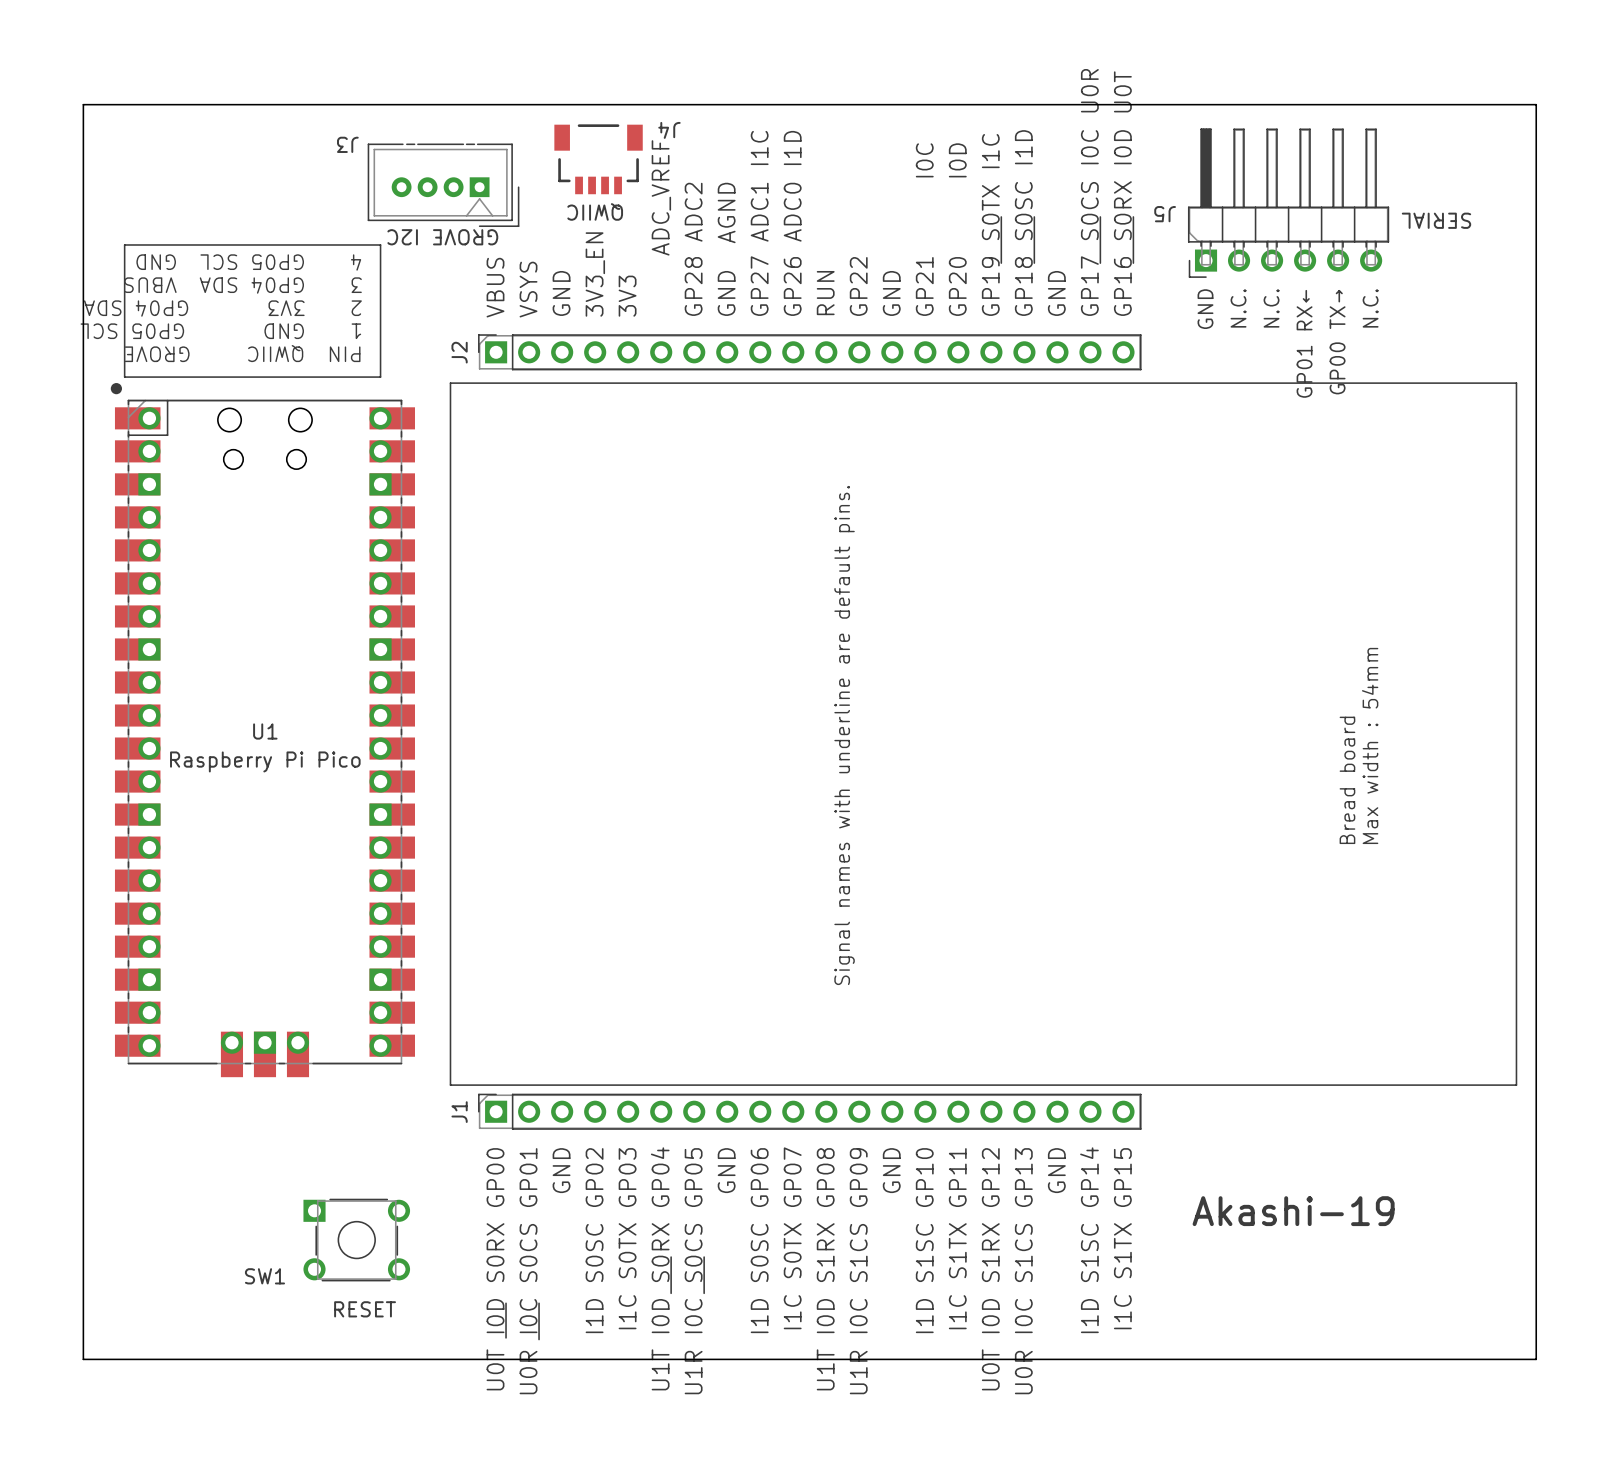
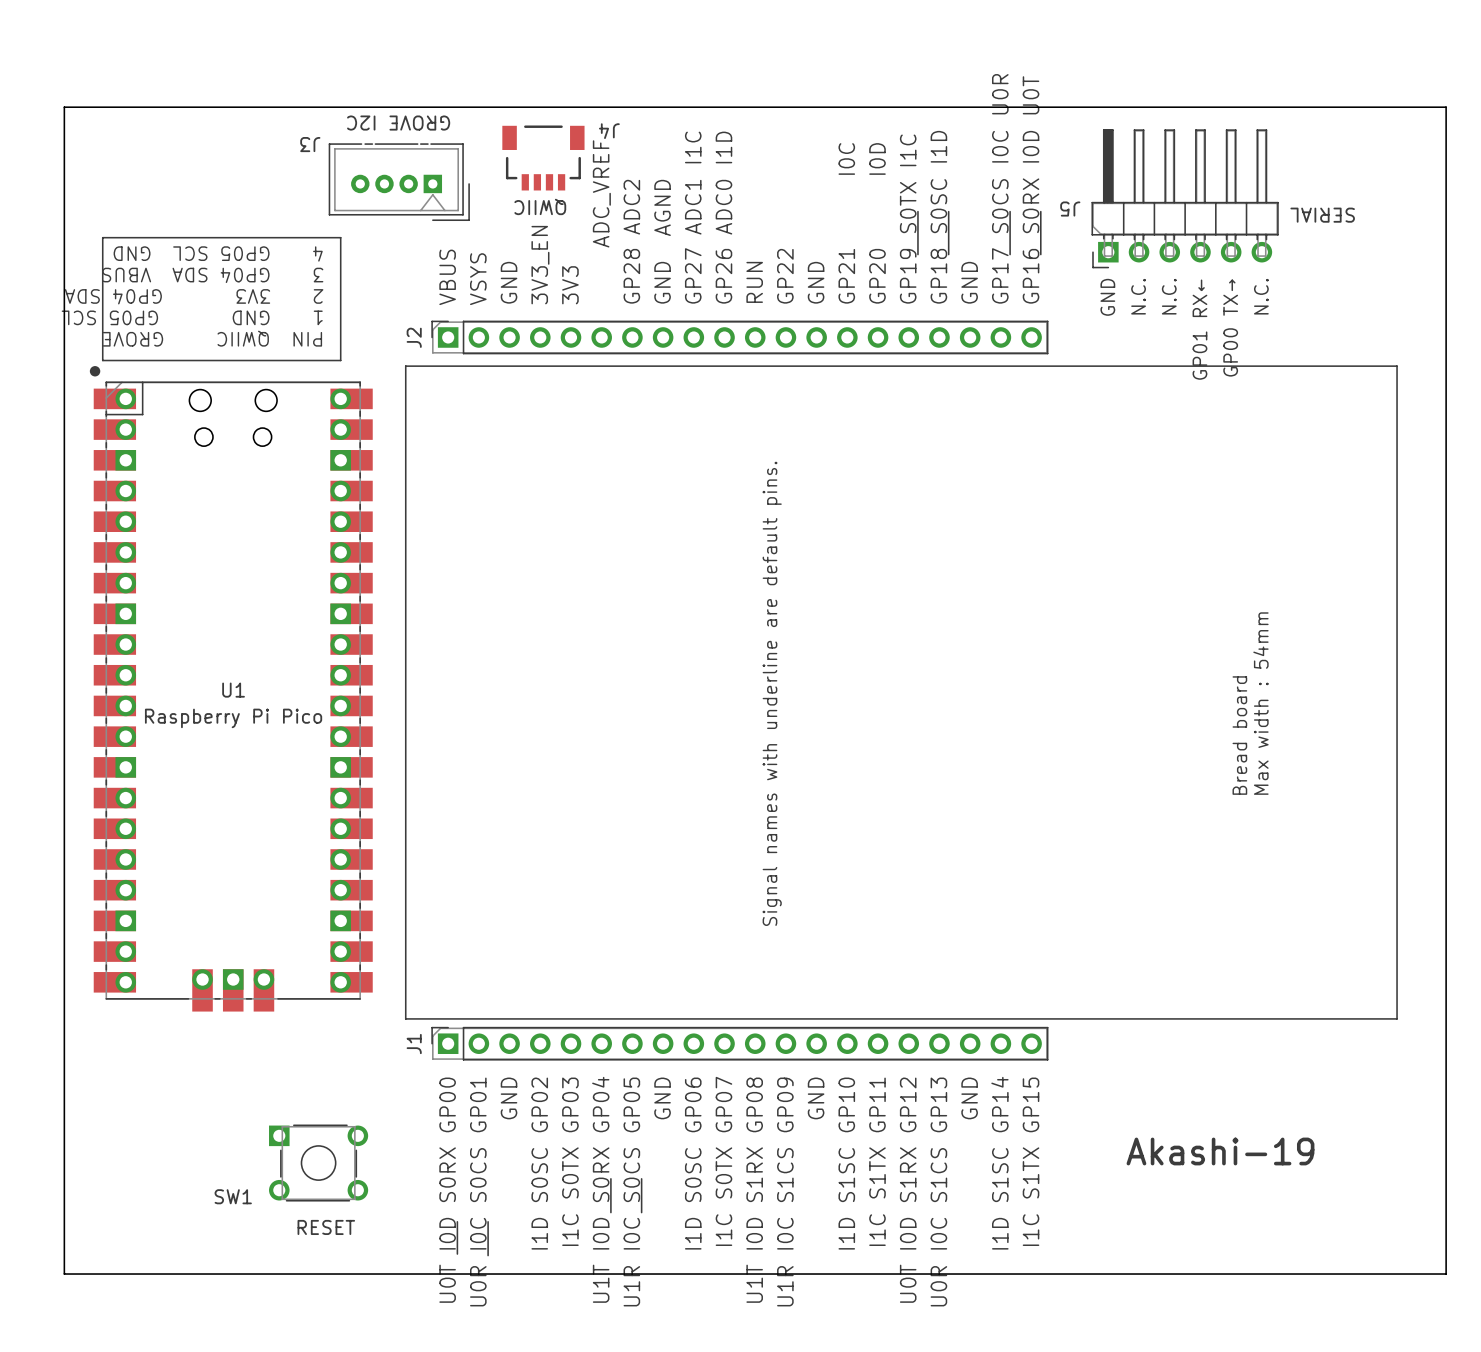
board edge: (1536, 104) (1536, 1359) -> (1415, 107) (1446, 107) (1446, 1274) (1415, 1274)
J3 value position: GROVE I2C (442, 237) -> GROVE I2C (398, 123)
text position: Akashi-19 (1293, 1211) -> Akashi-19 (1220, 1151)

